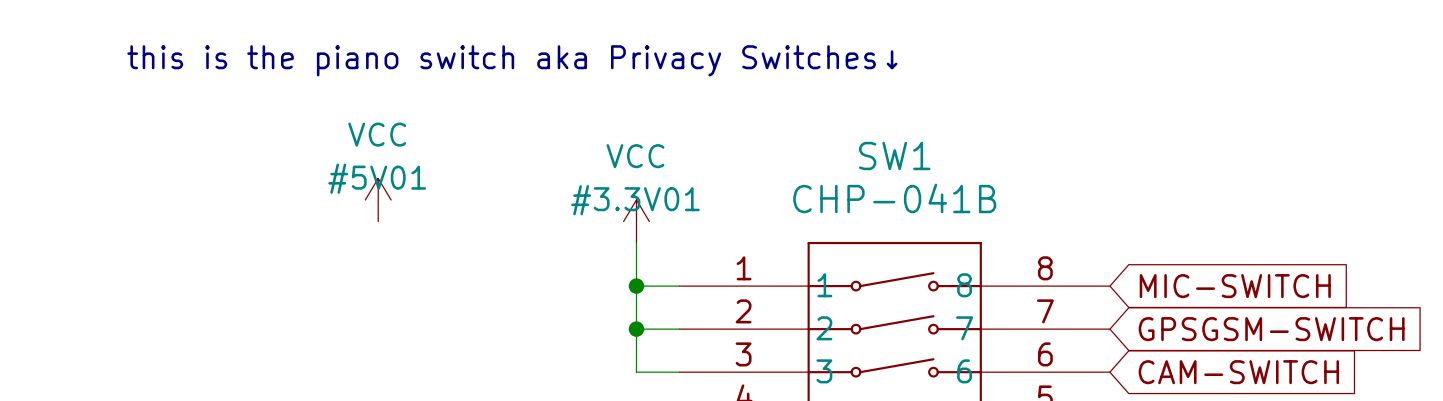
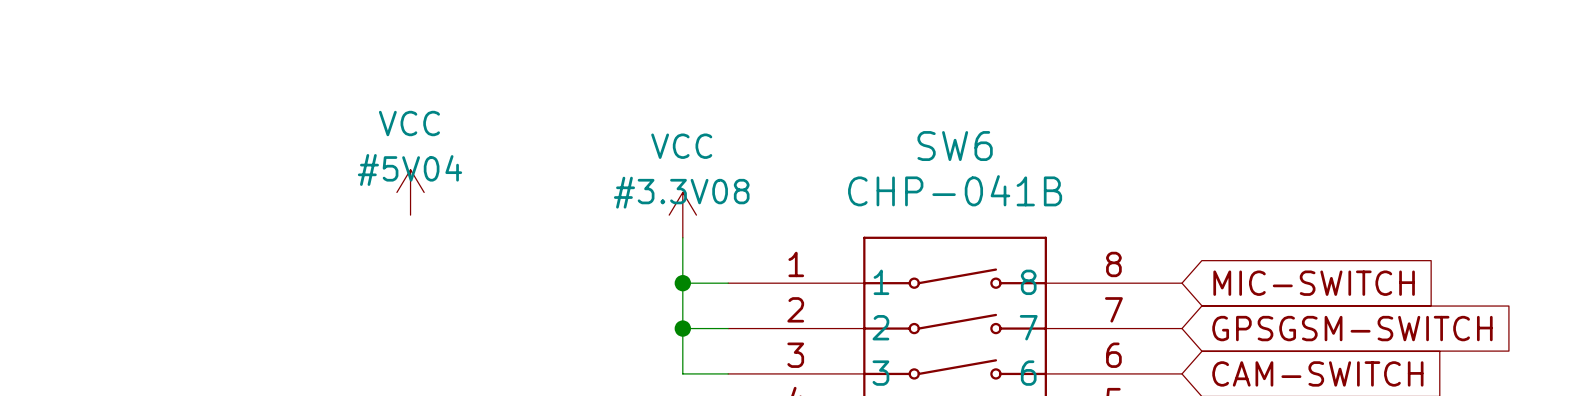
text: this is the piano switch aka Privacy Switches↓ (512, 60) -> none
SW1 name: SW1 (894, 155) -> SW6 (955, 146)
#5V01 name: #5V01 (377, 178) -> #5V04 (410, 169)
#3.3V01 name: #3.3V01 (635, 200) -> #3.3V08 (681, 192)

